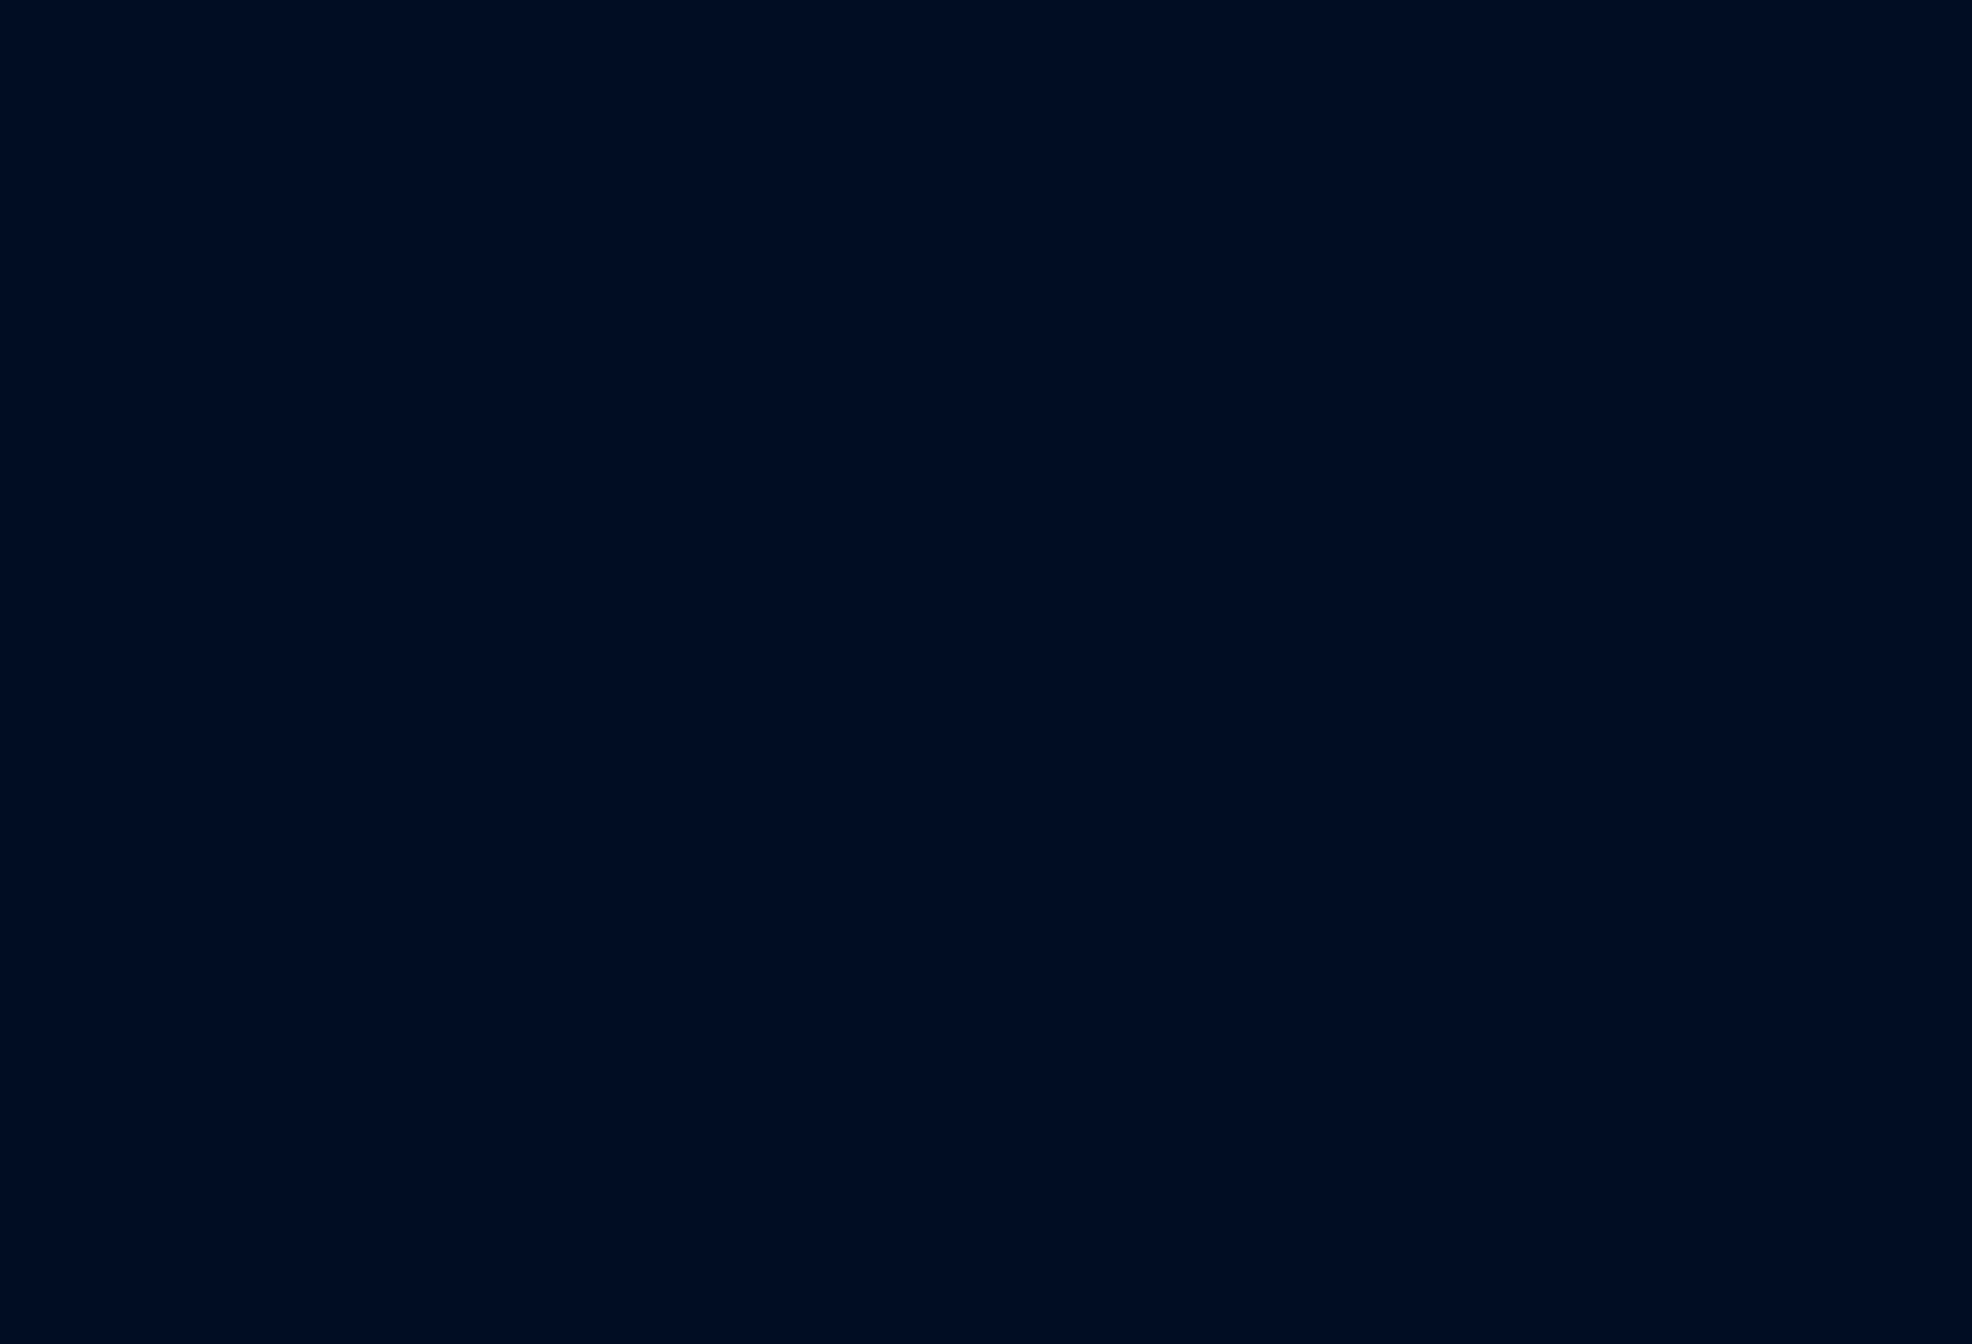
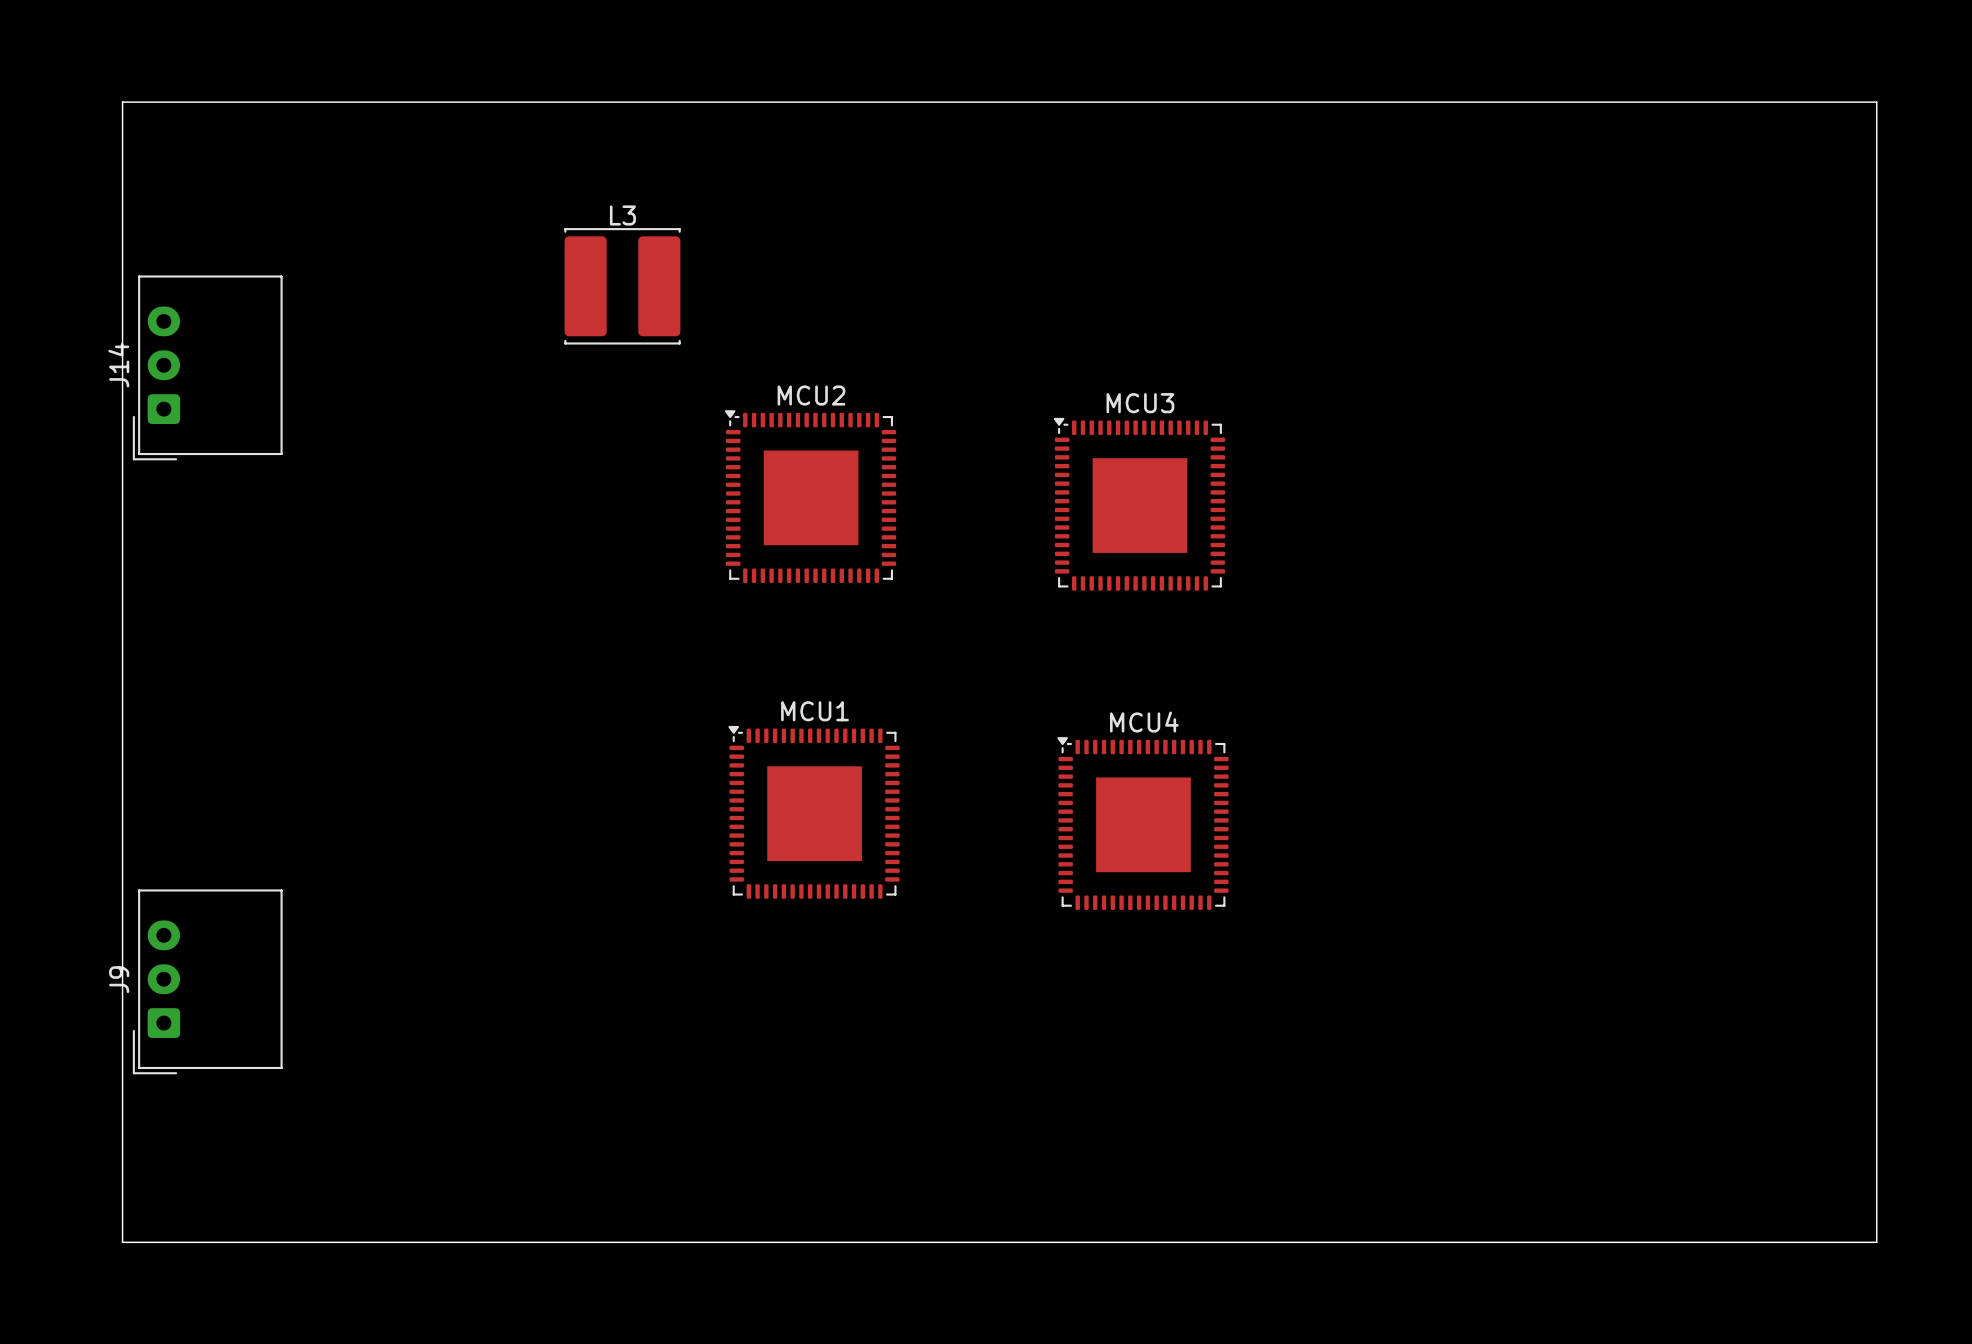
board edge: none -> (122, 102) (122, 1242) (1876, 1242) (1876, 102) (122, 102)
L3: none -> (622, 286)
J14: none -> (207, 367)
MCU2: none -> (810, 496)
MCU3: none -> (1139, 504)
MCU1: none -> (814, 812)
MCU4: none -> (1142, 823)
J9: none -> (207, 981)

